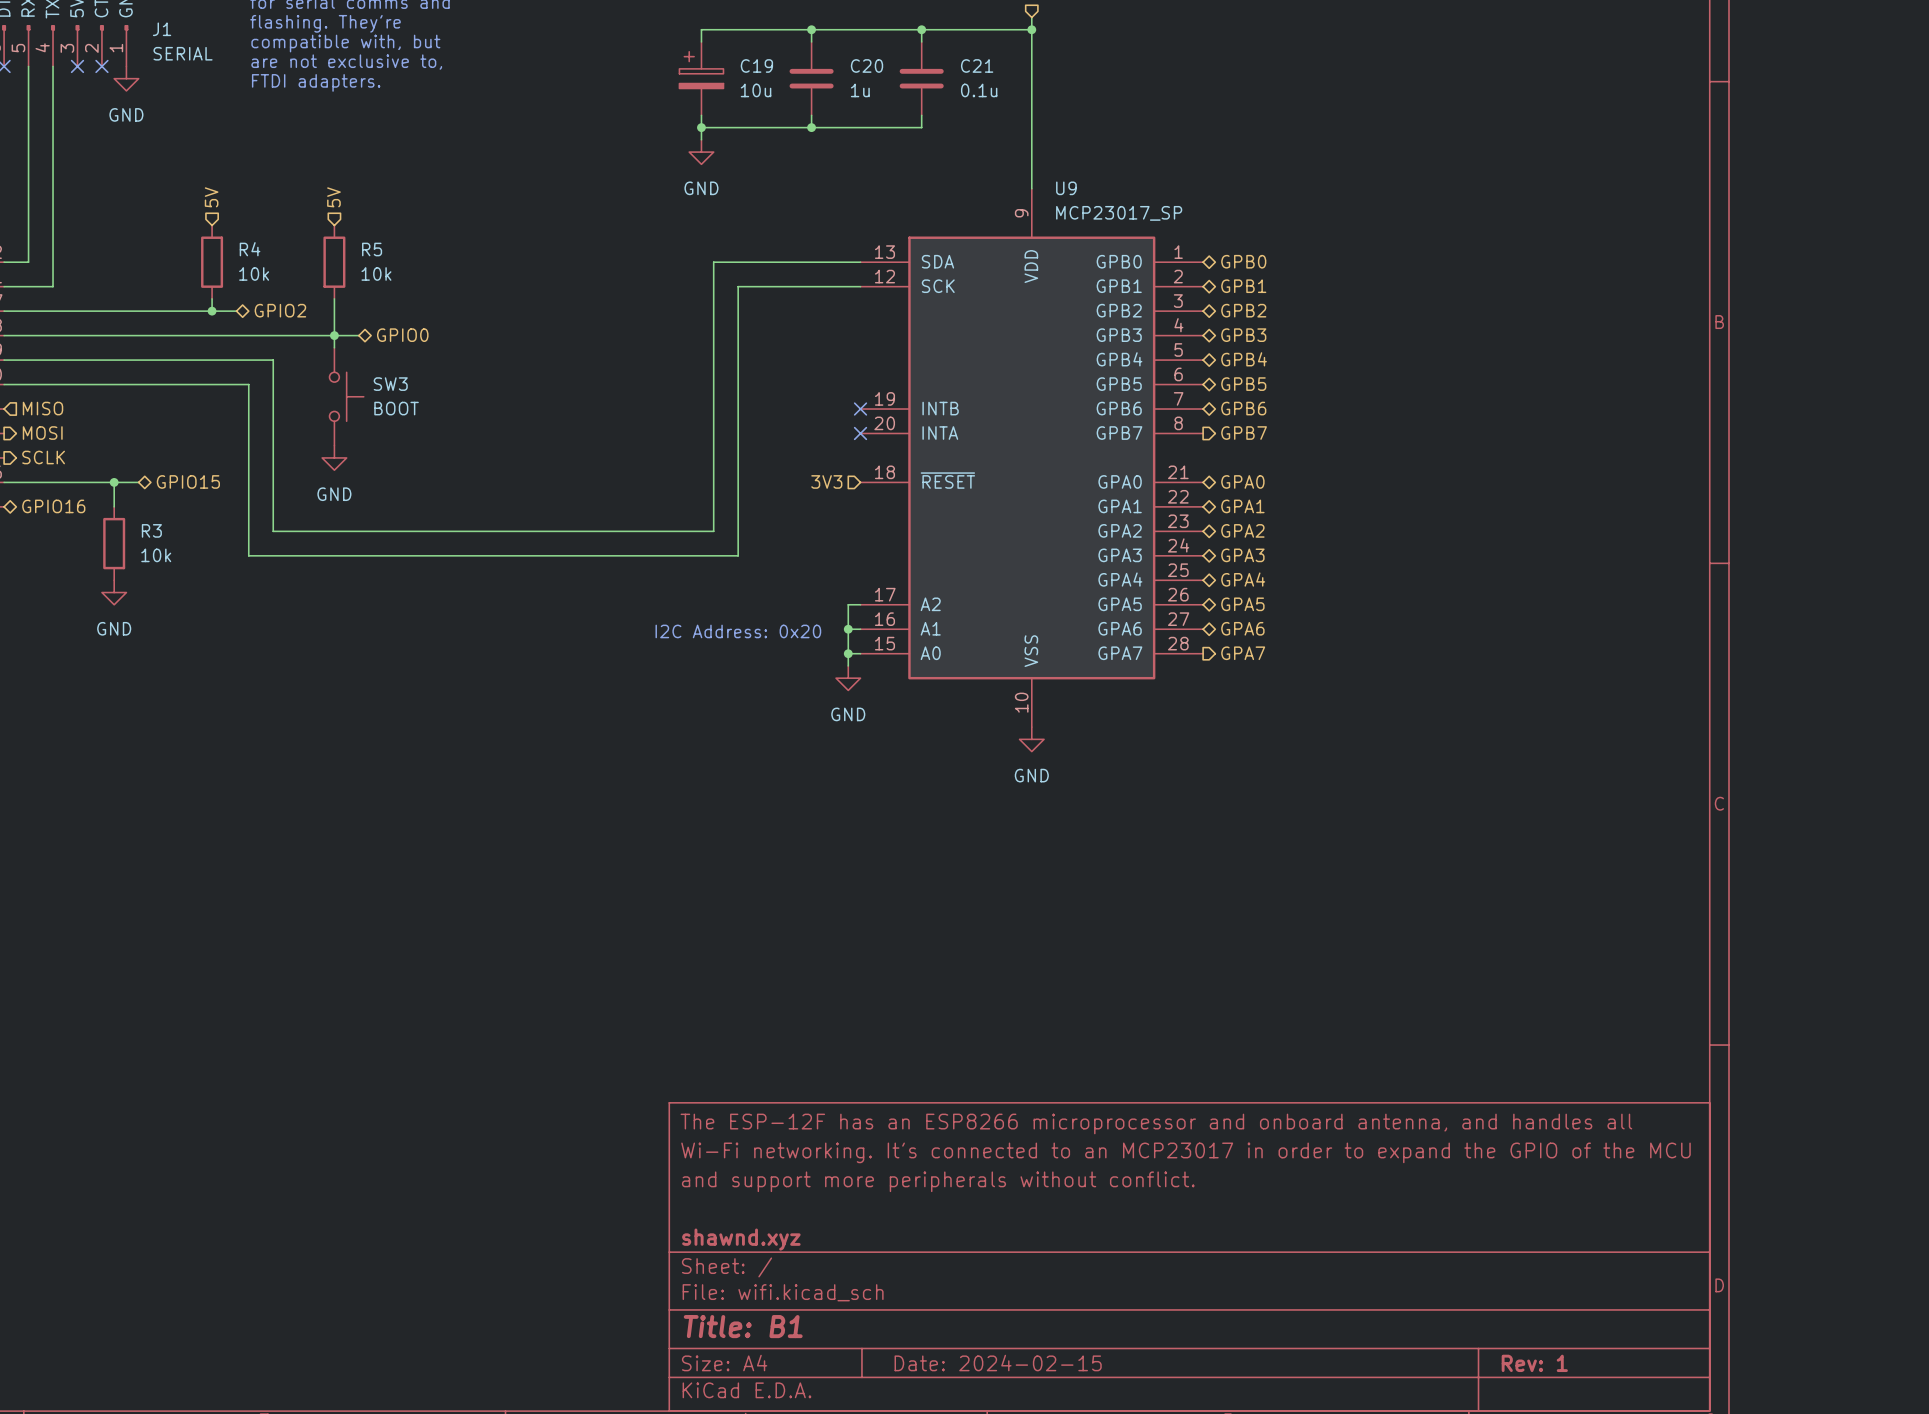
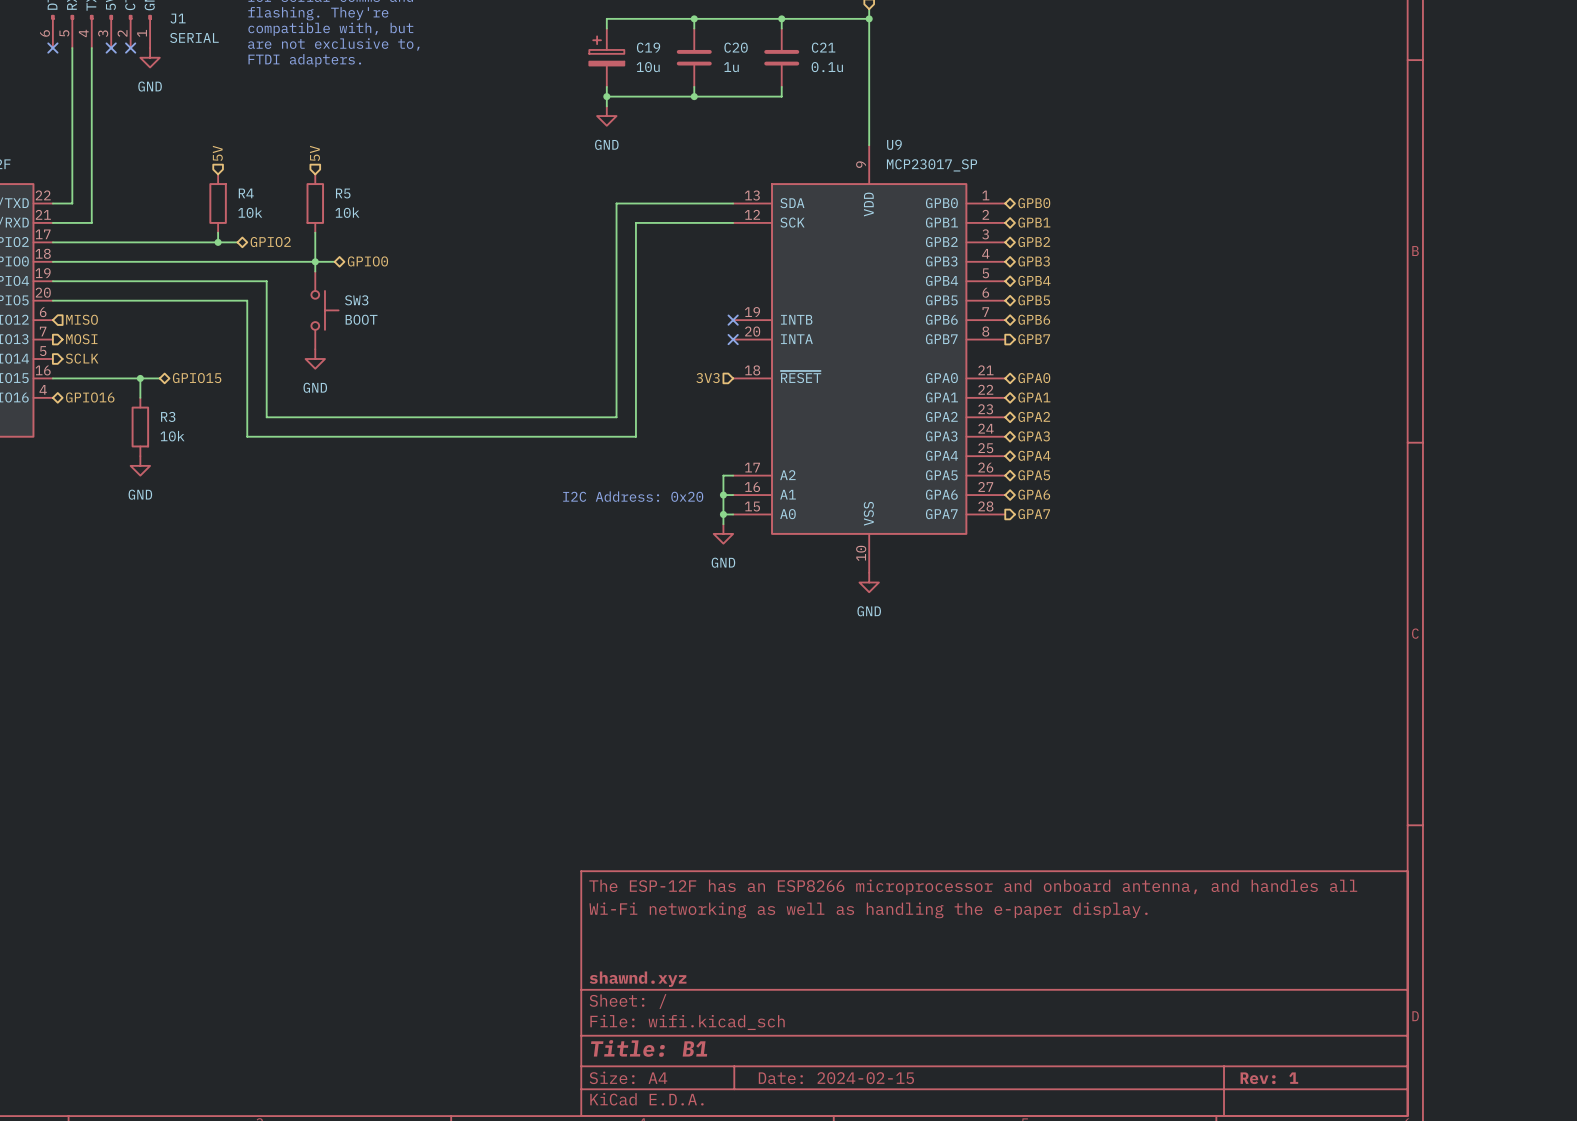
title block: Wi-Fi networking. It's connected to an MCP23017 in order to expand the GPIO of the MCU (1186, 1152) -> Wi-Fi networking as well as handling the e-paper display. (868, 910)
title block: and support more peripherals without conflict. (938, 1181) -> none

